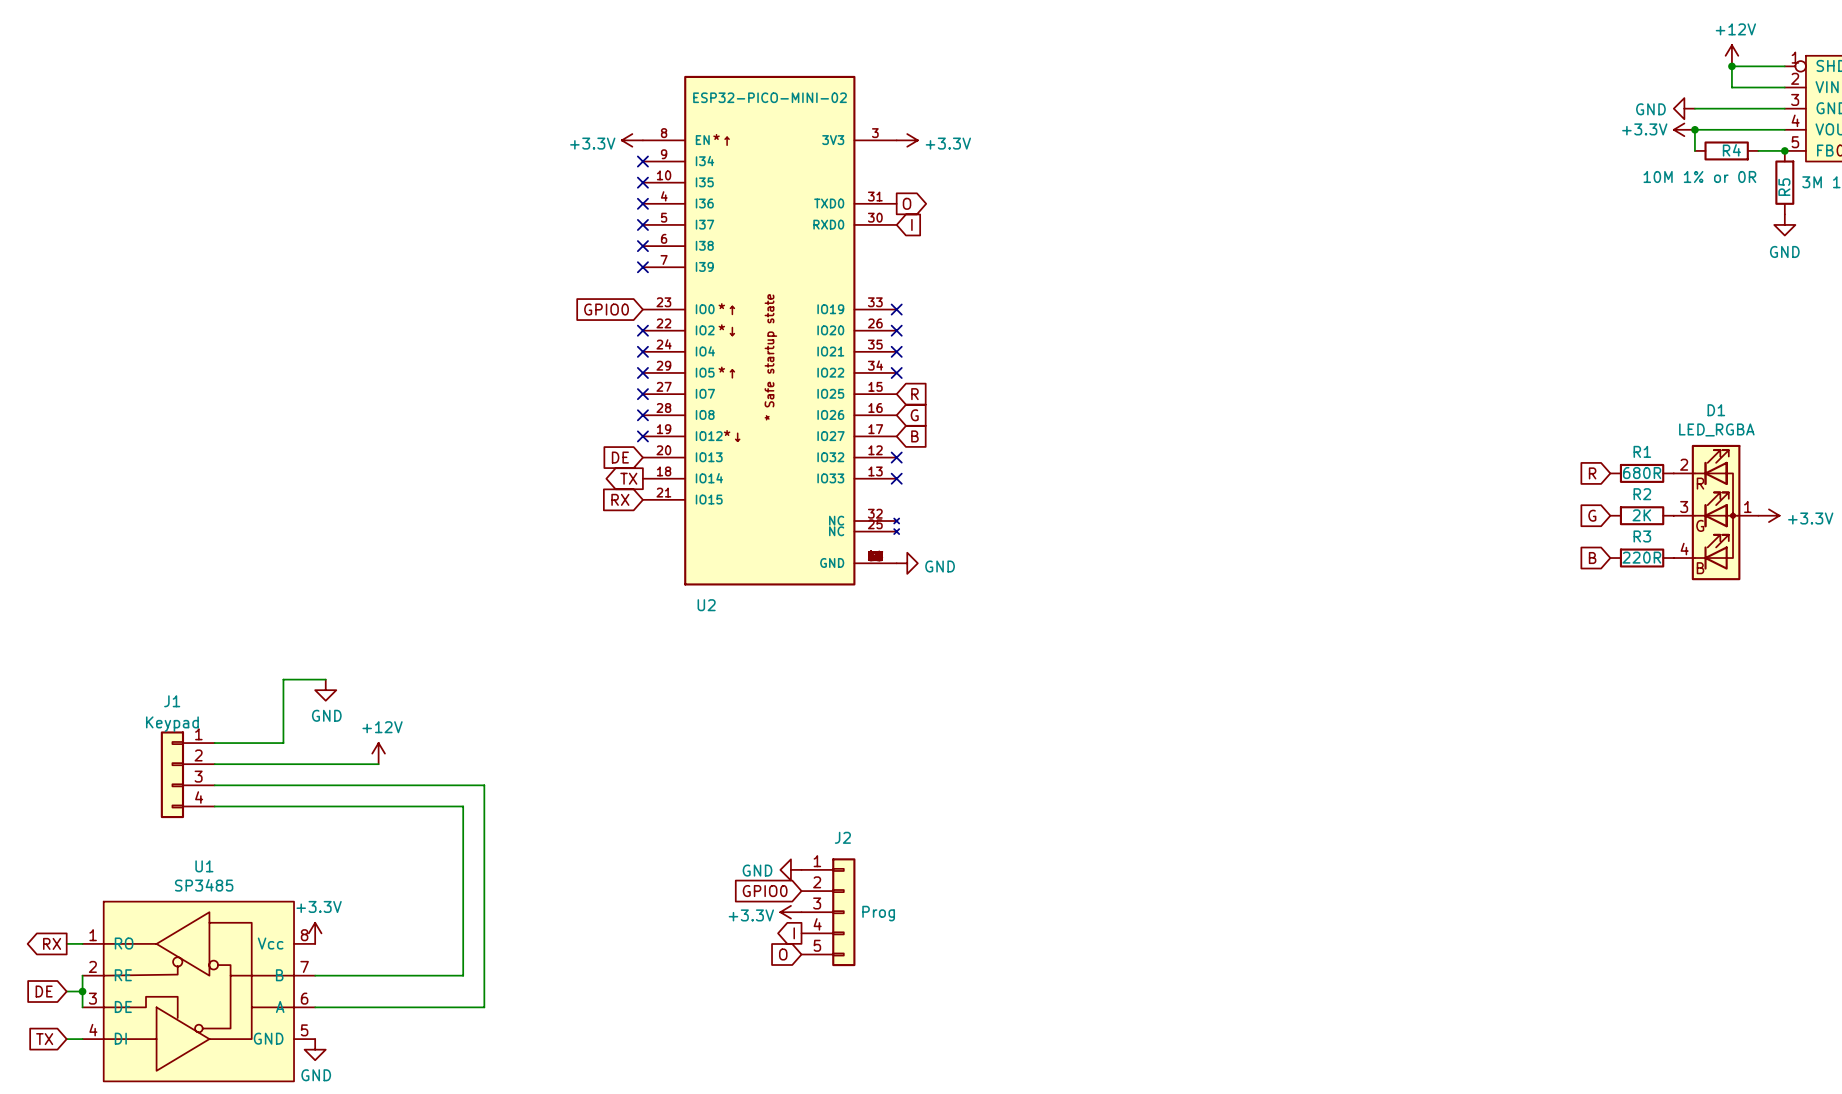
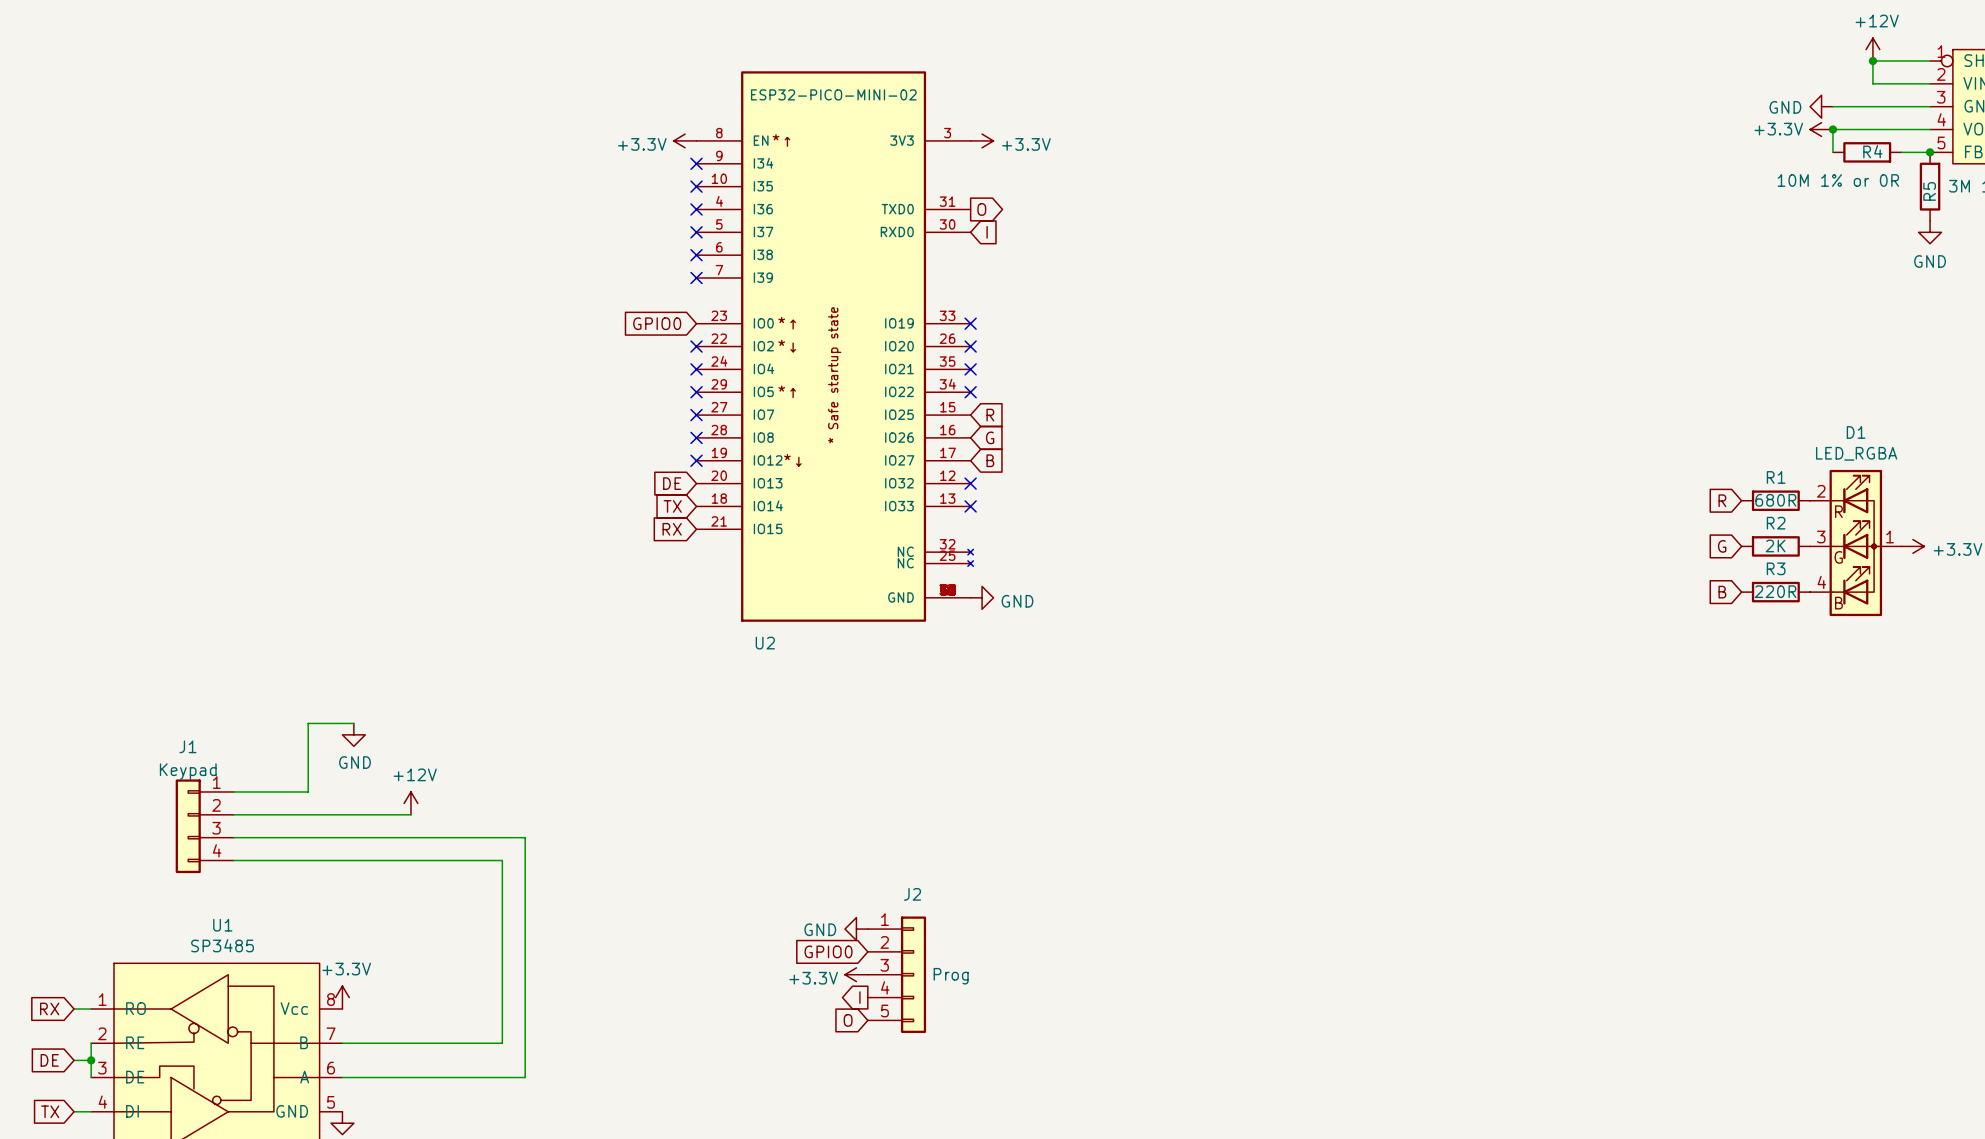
global label shape: output (628, 478) -> input (672, 506)
global label shape: output (52, 943) -> input (49, 1009)

